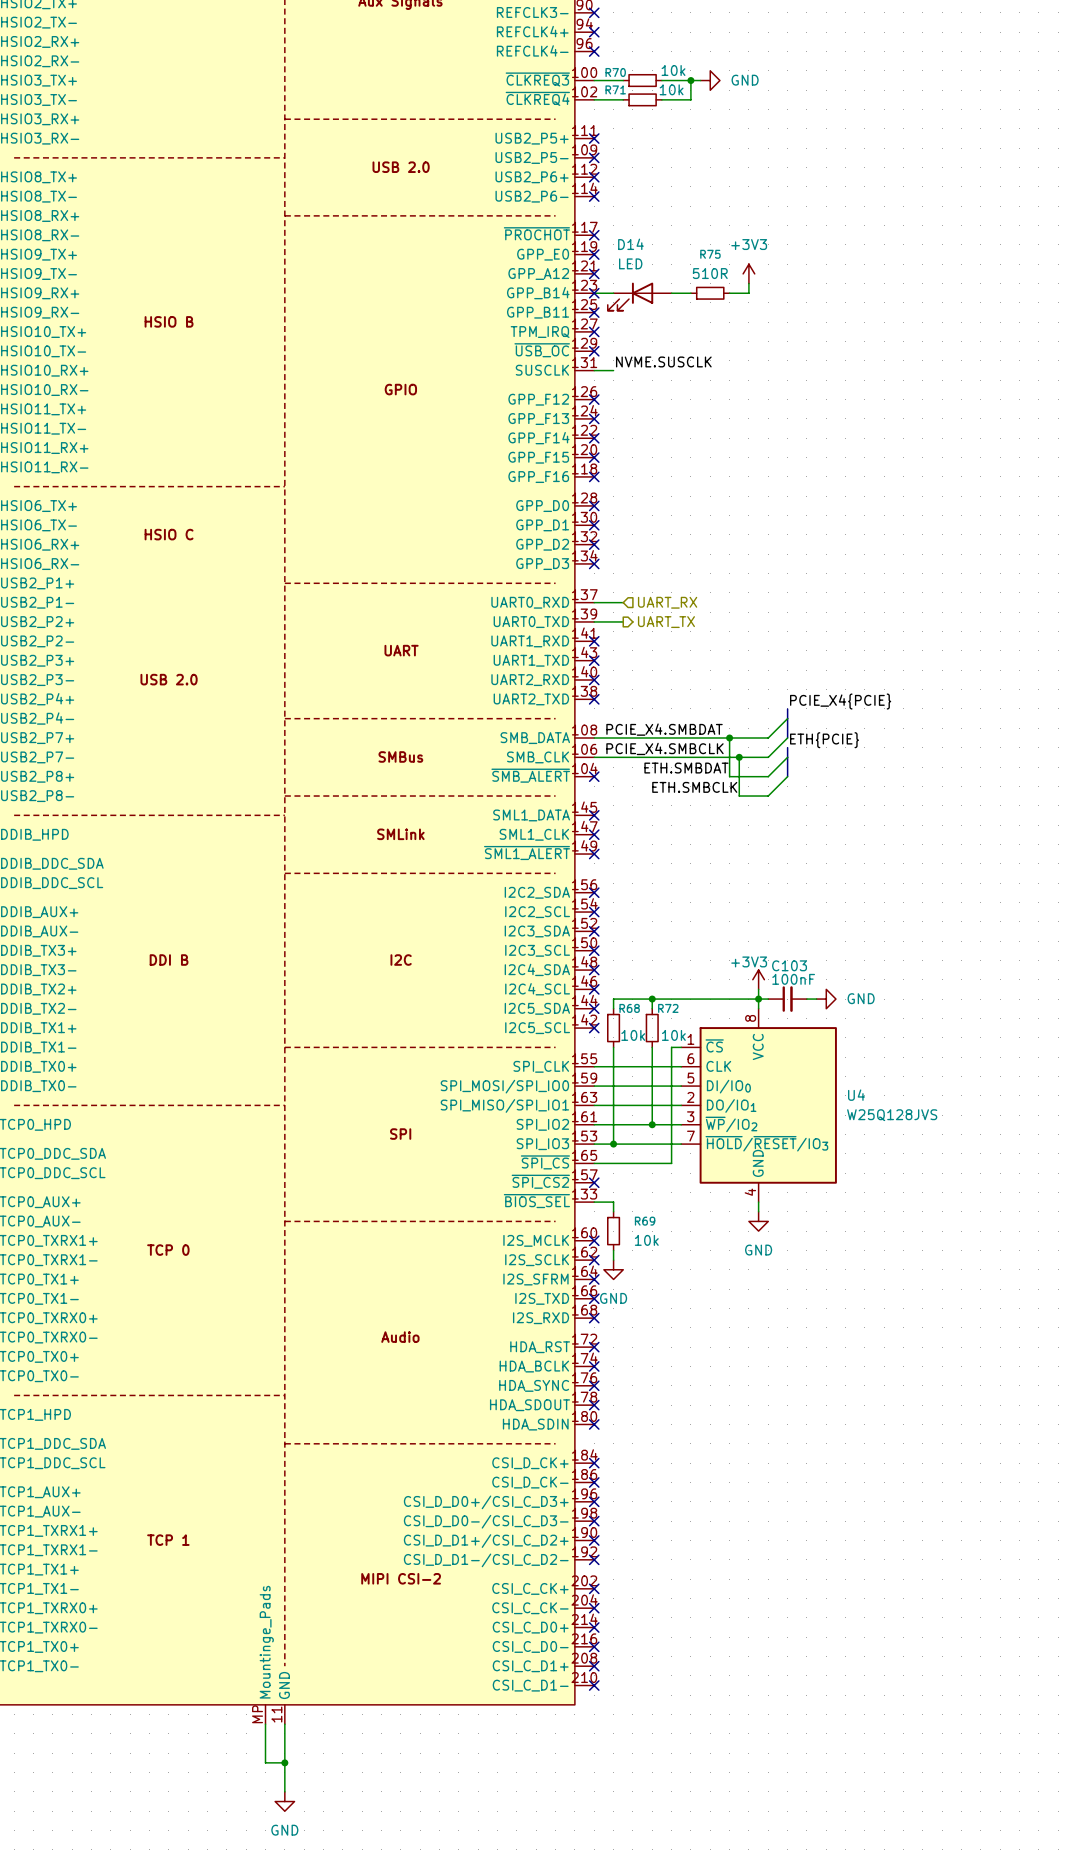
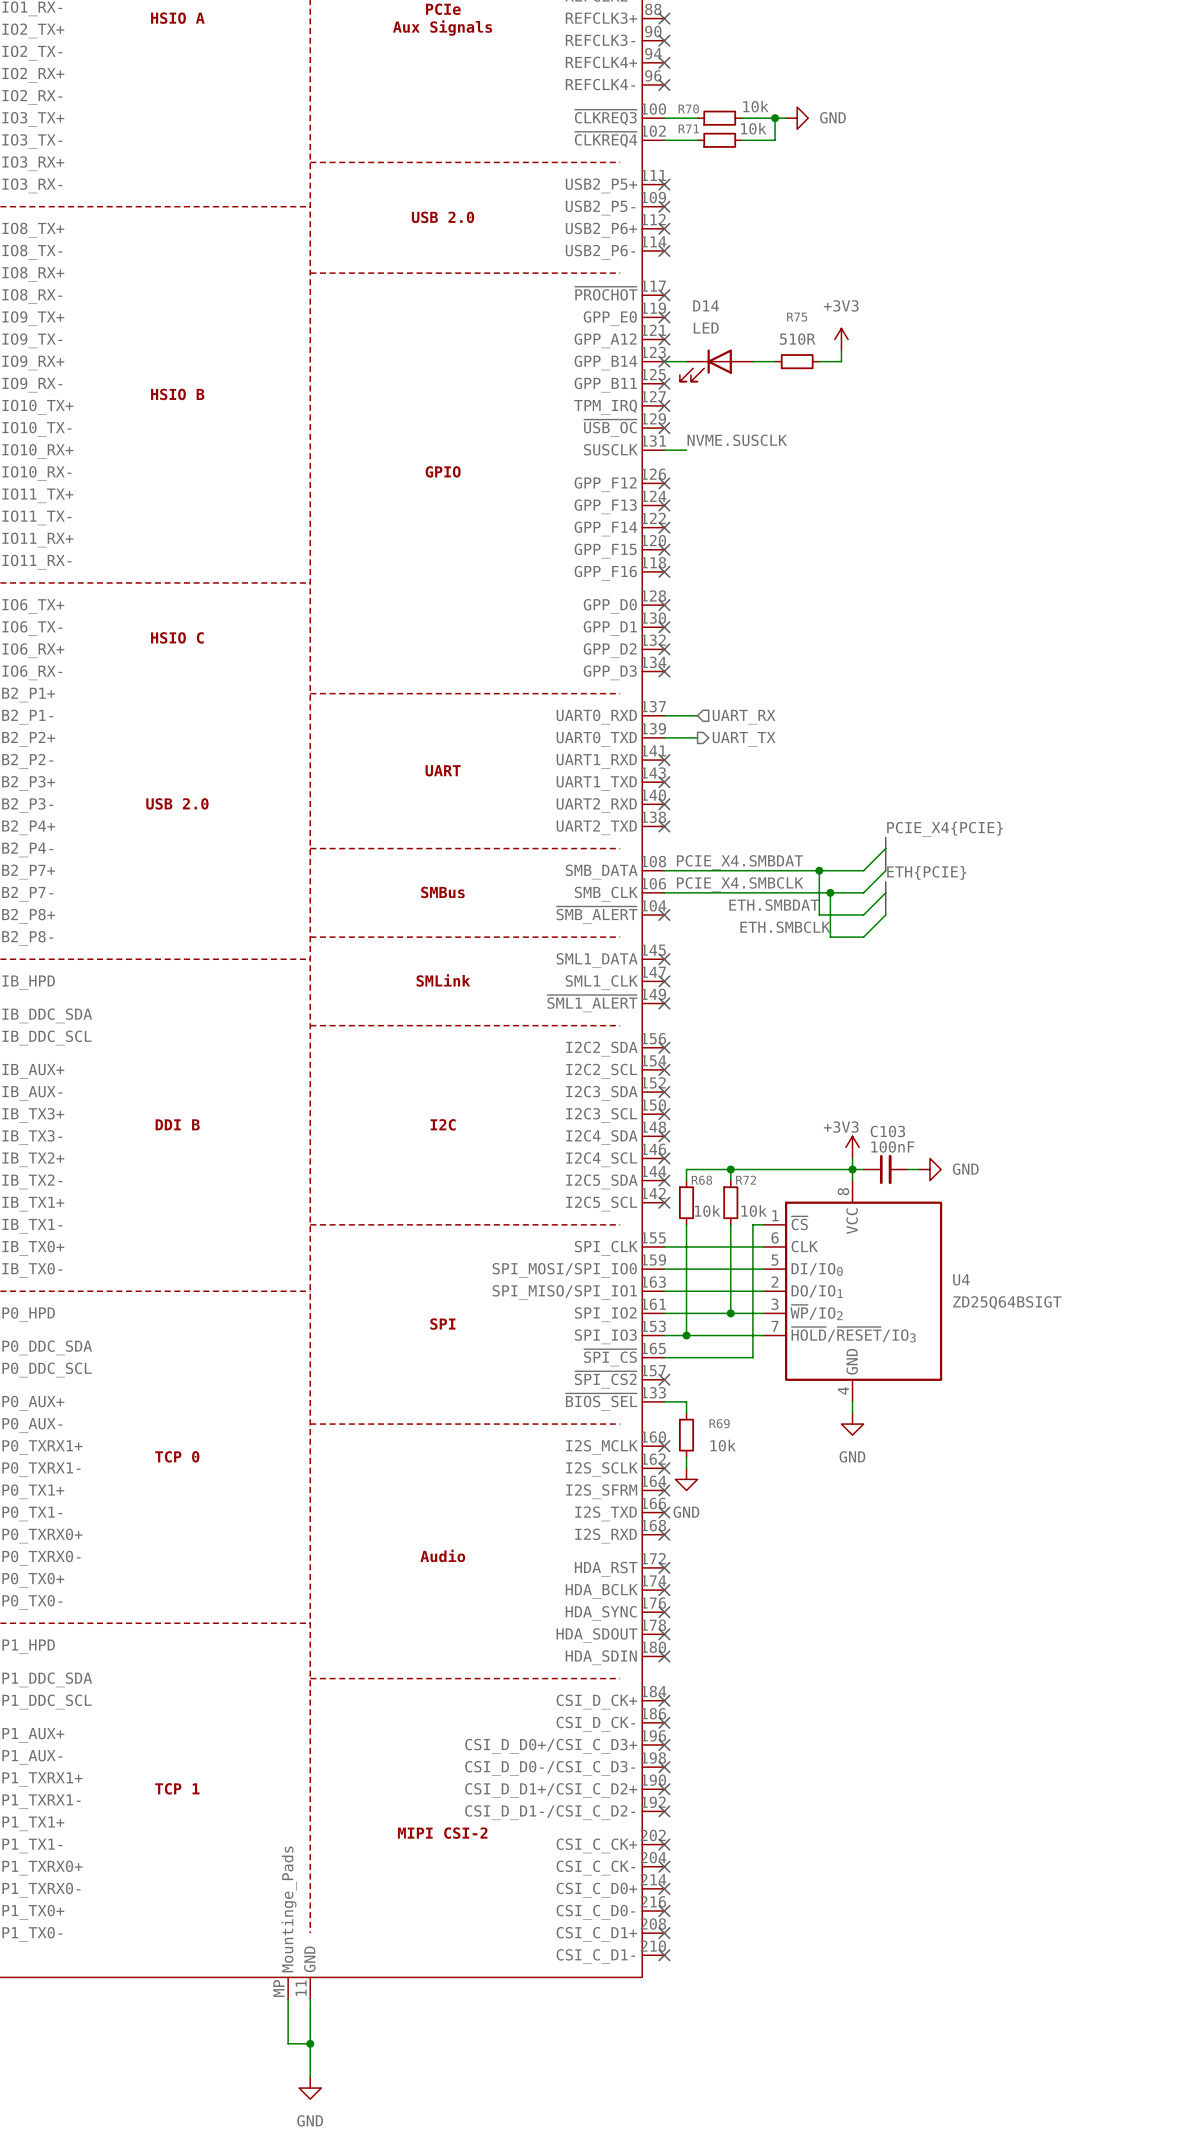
U4 value: W25Q128JVS (892, 1115) -> ZD25Q64BSIGT (1007, 1302)

